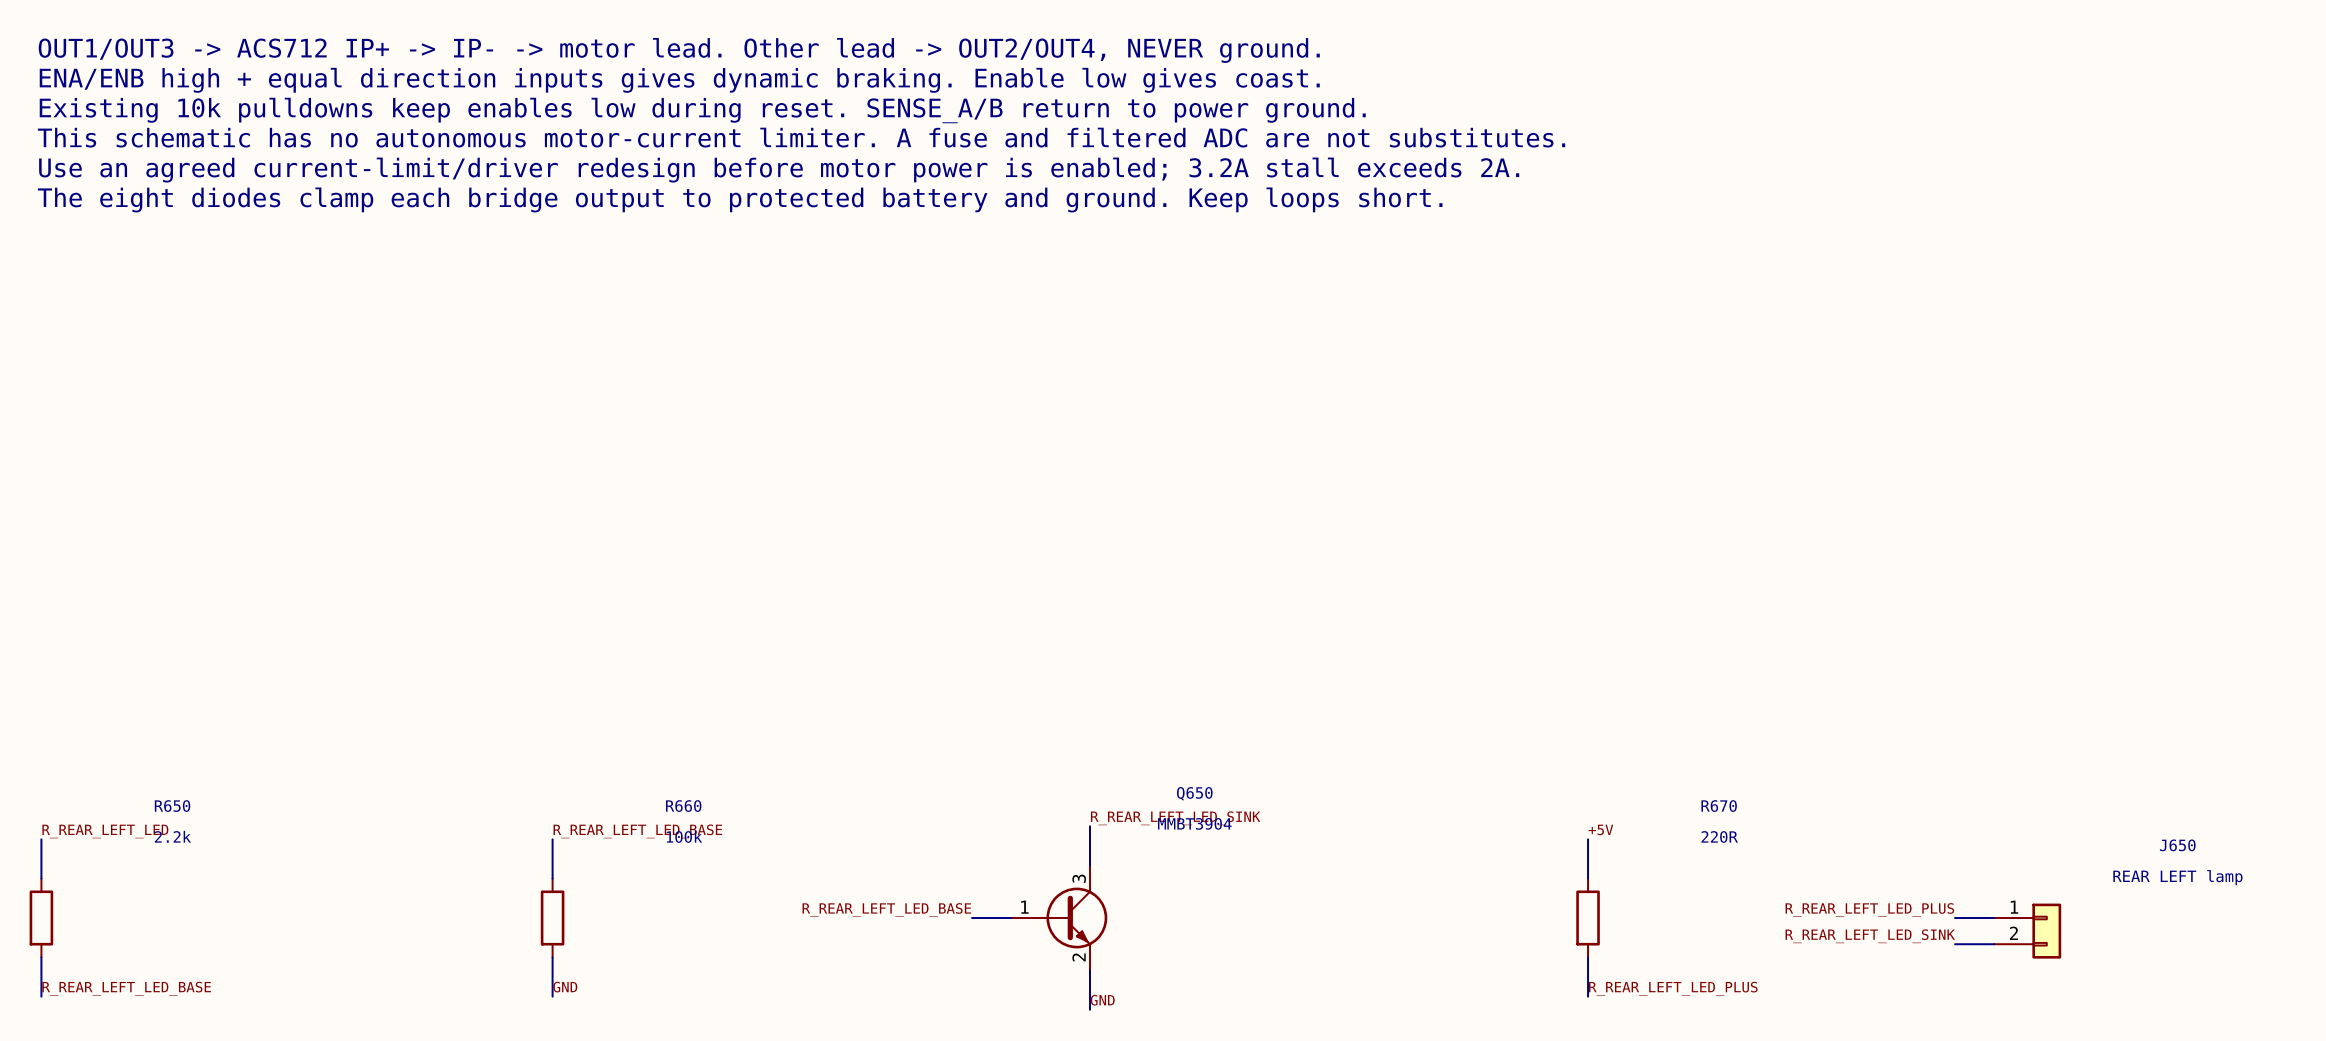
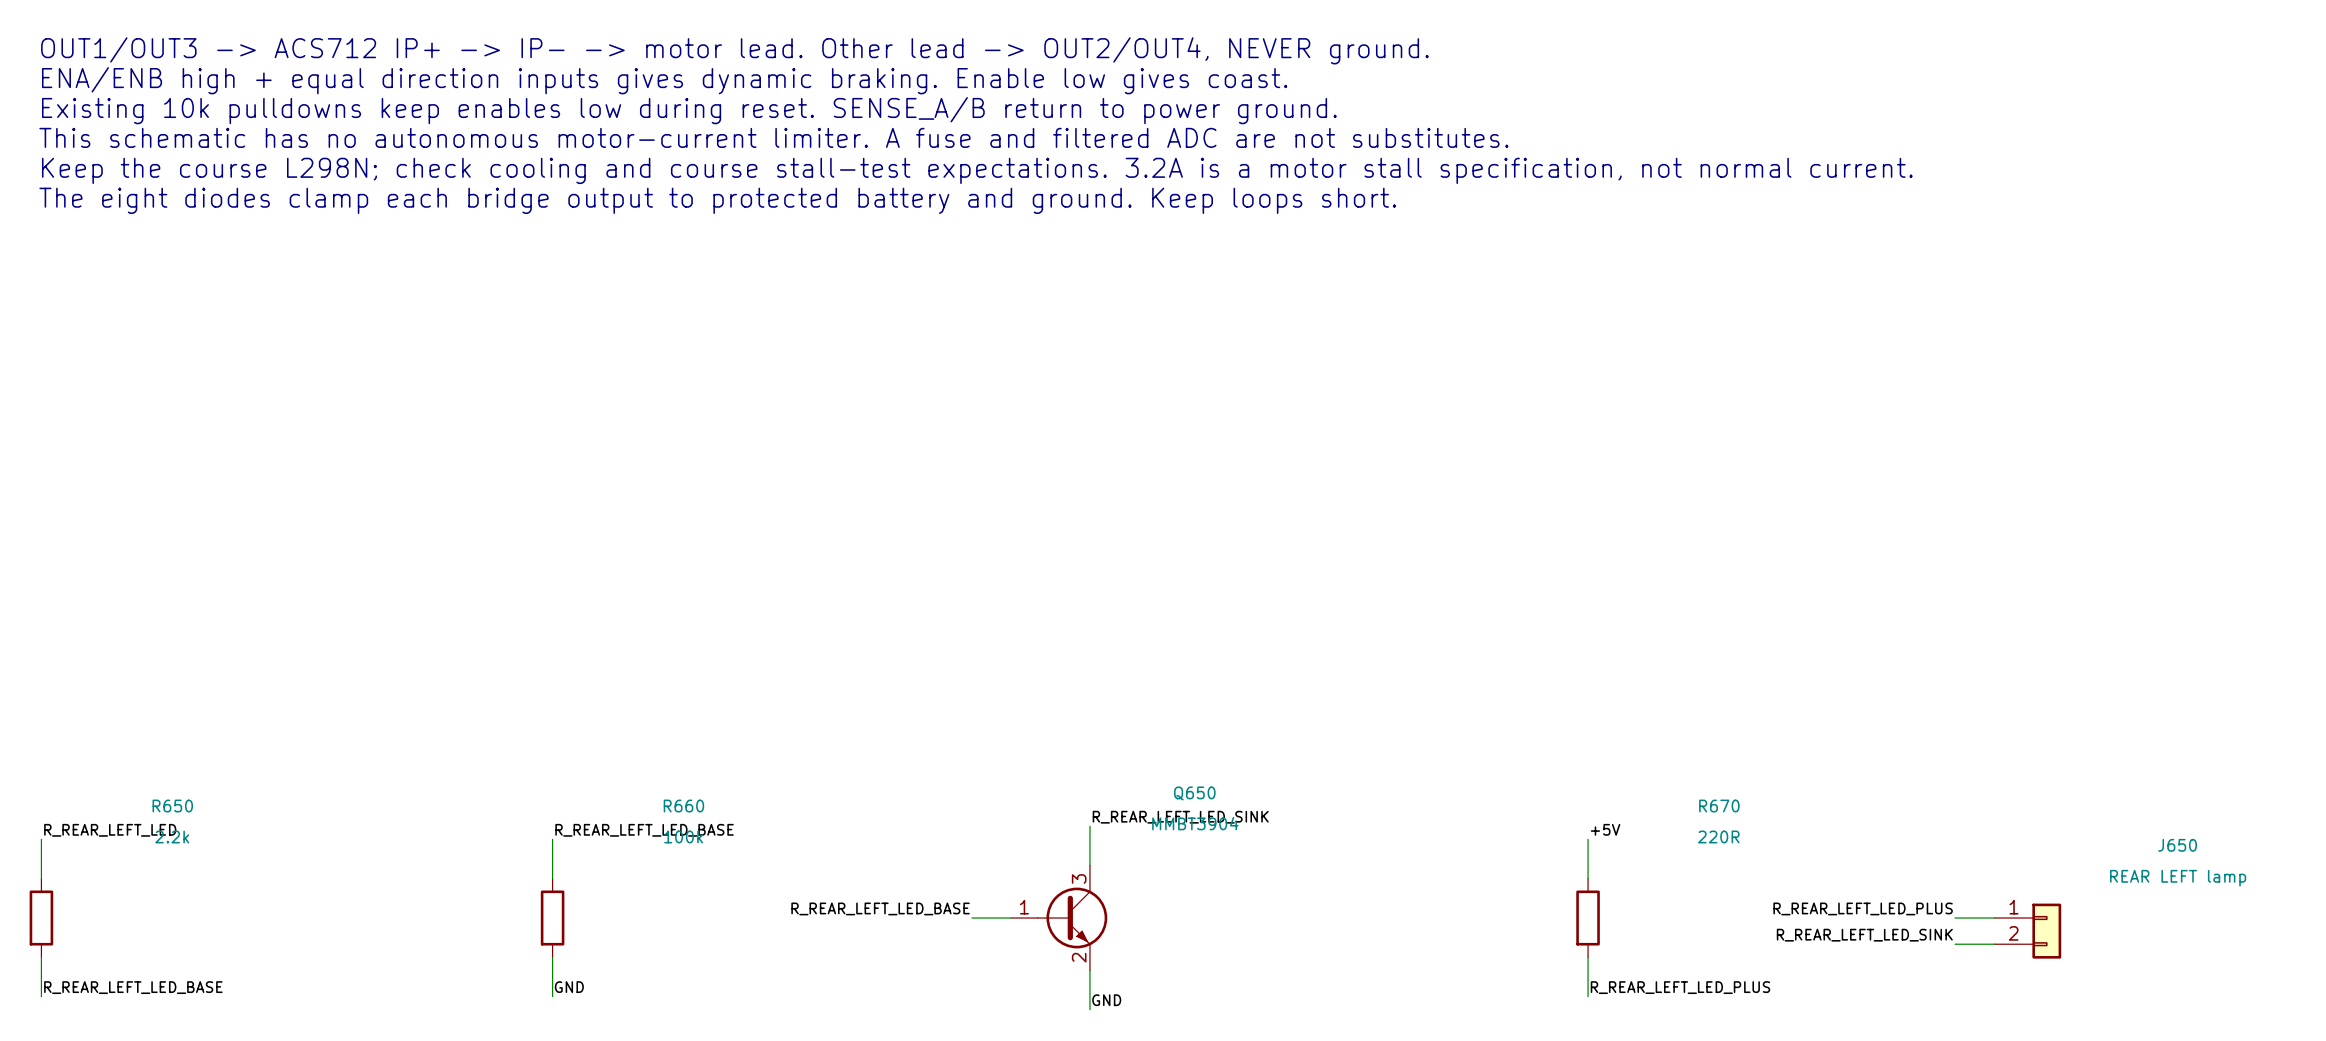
text: Use an agreed current-limit/driver redesign before motor power is enabled; 3.2A stall exceeds 2A. (779, 170) -> Keep the course L298N; check cooling and course stall-test expectations. 3.2A is a motor stall specification, not normal current. (977, 170)

